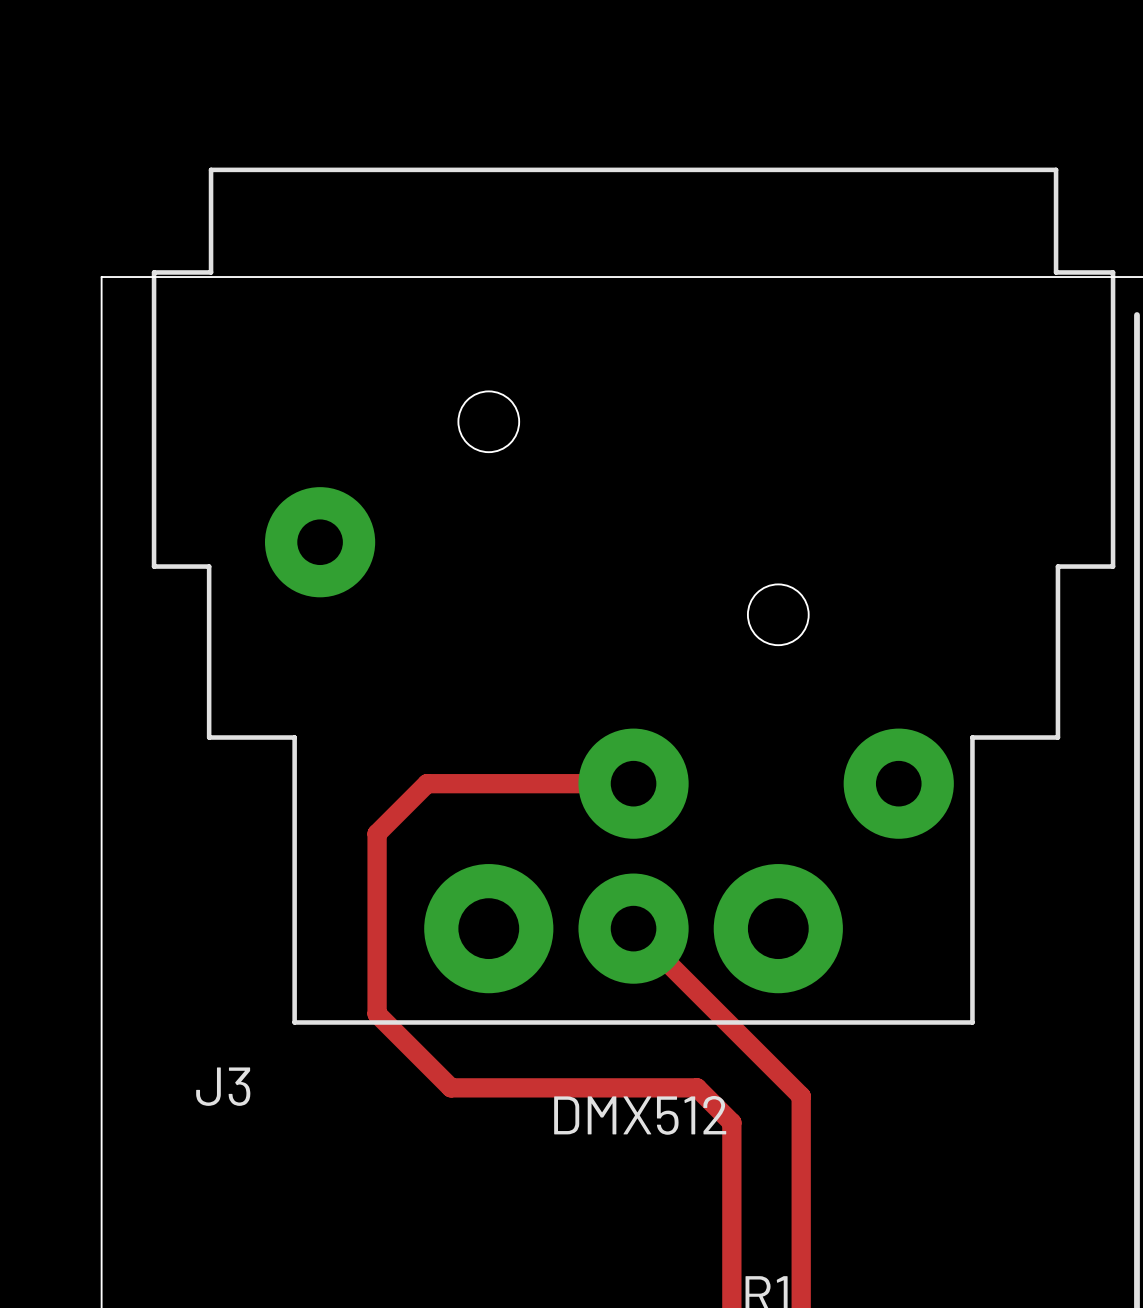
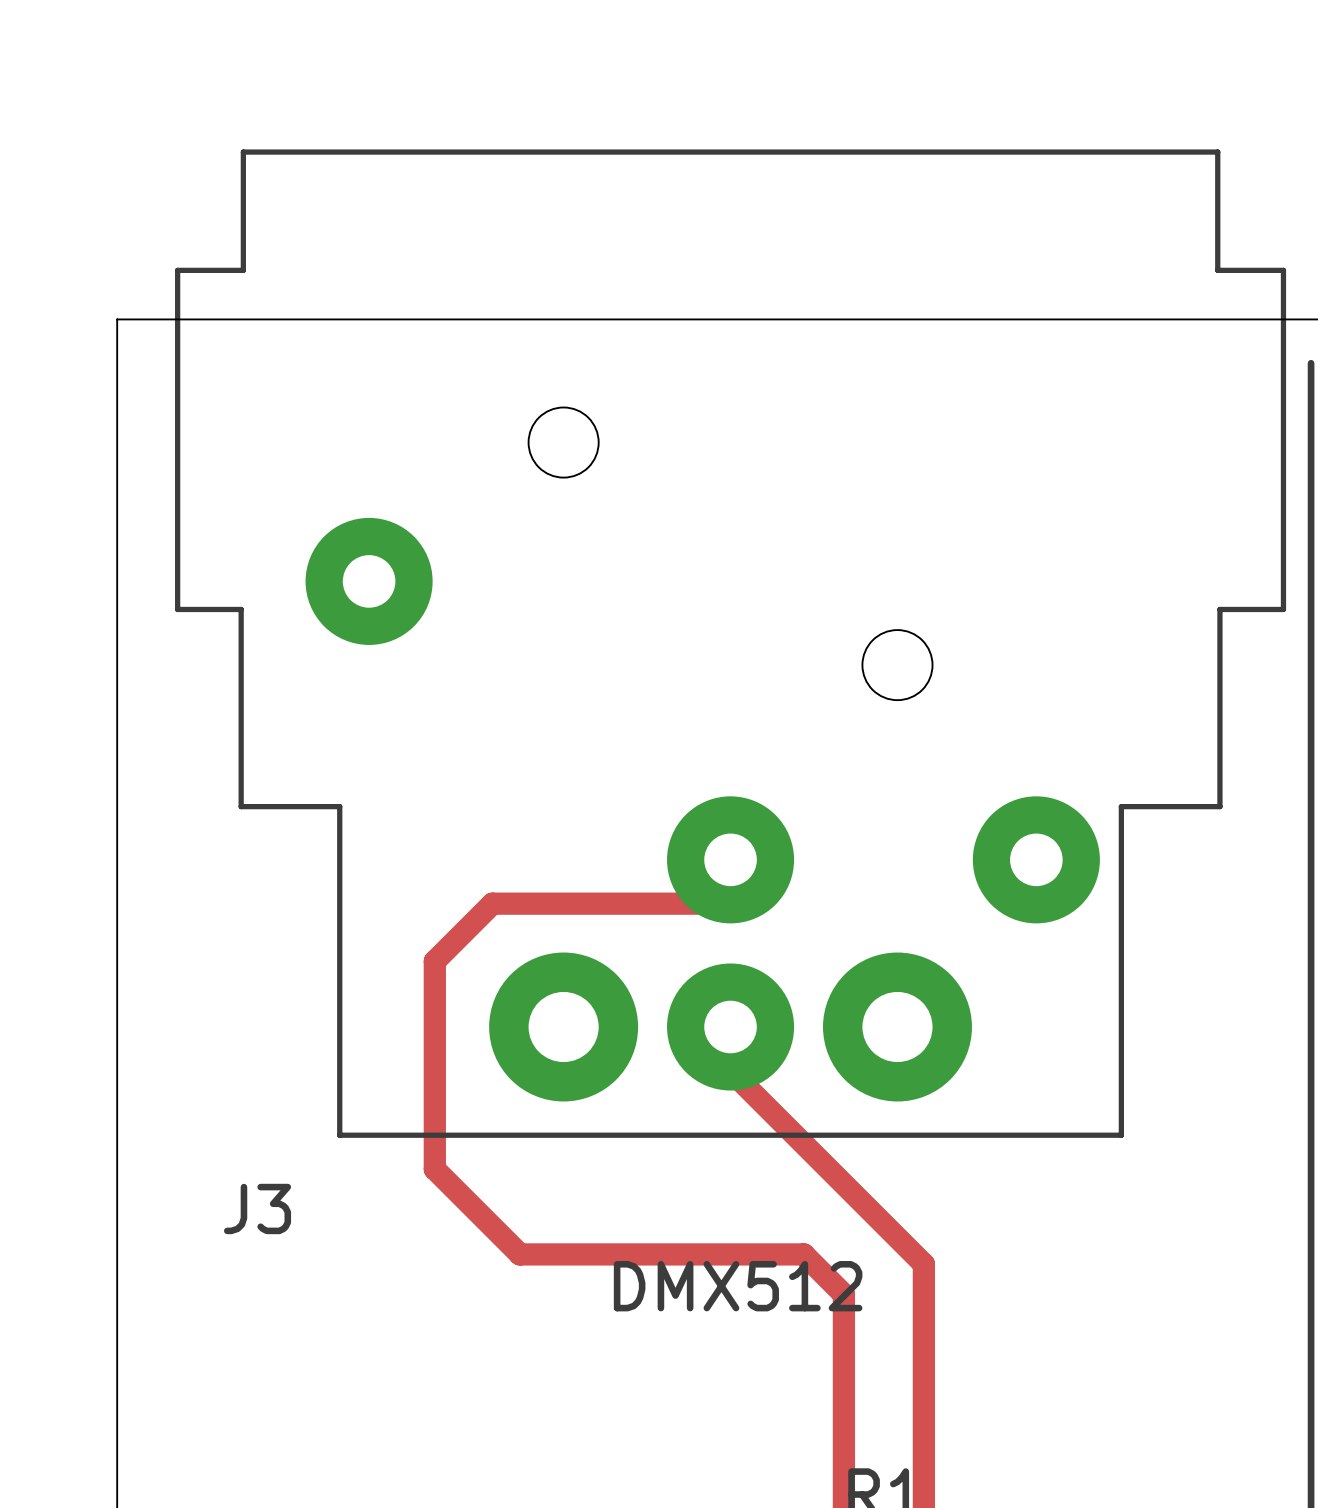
J3 position: (633, 596) -> (730, 643)

